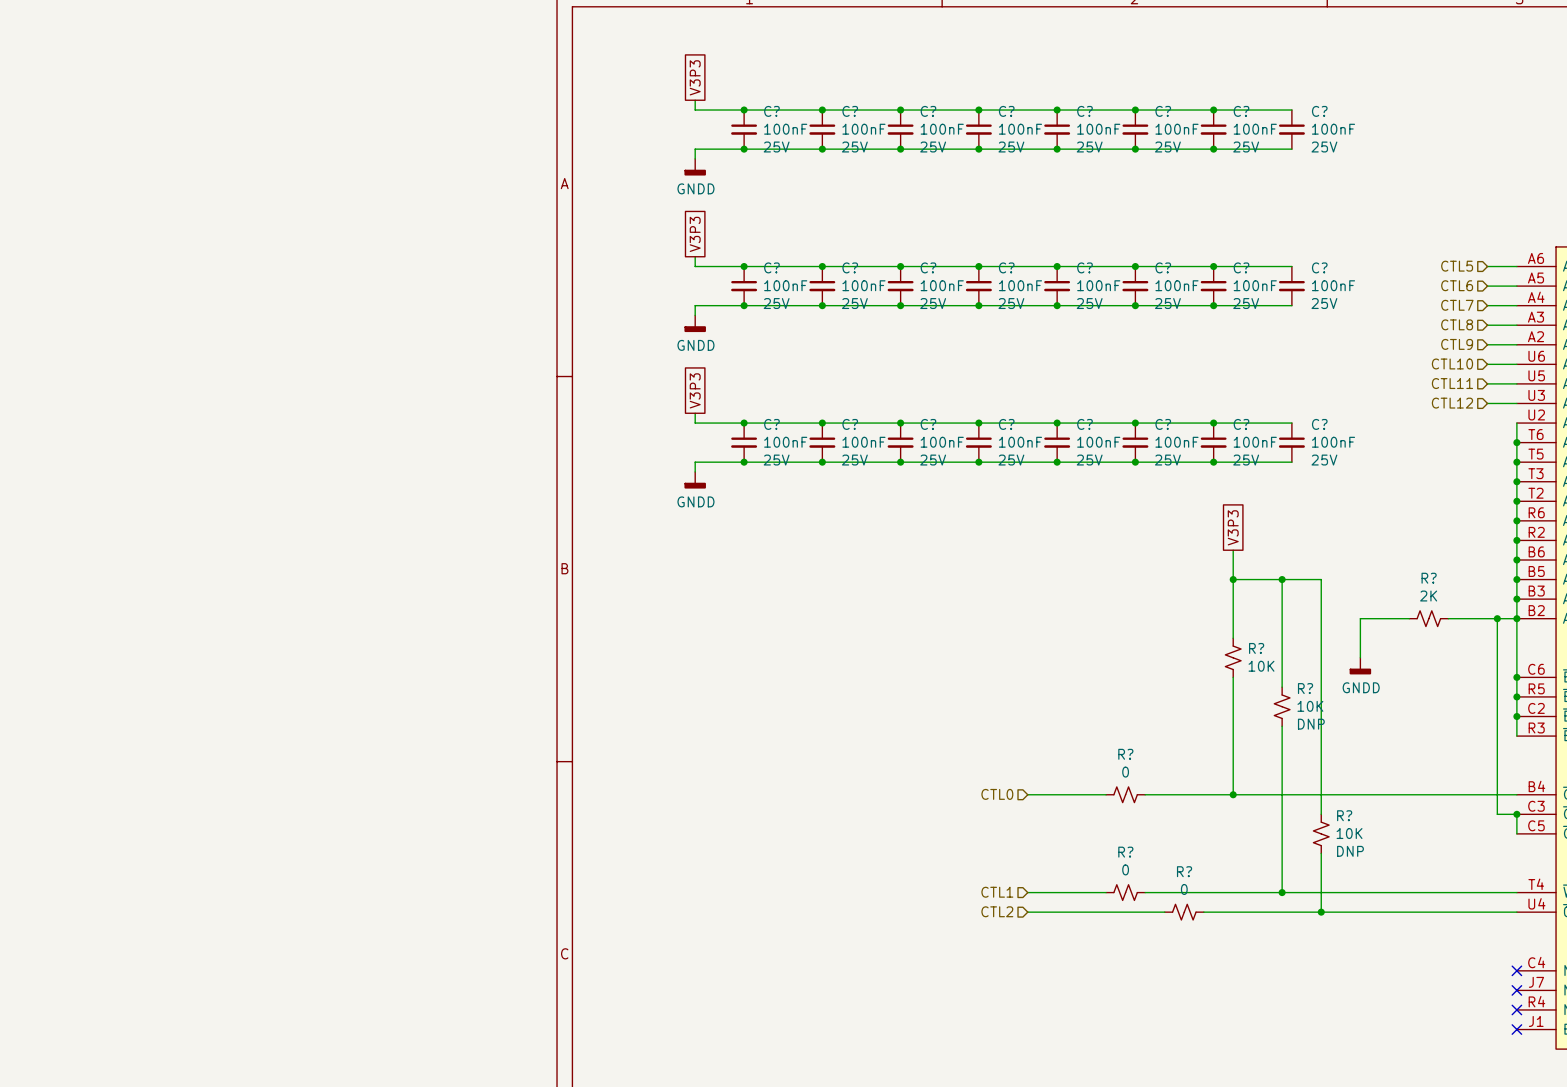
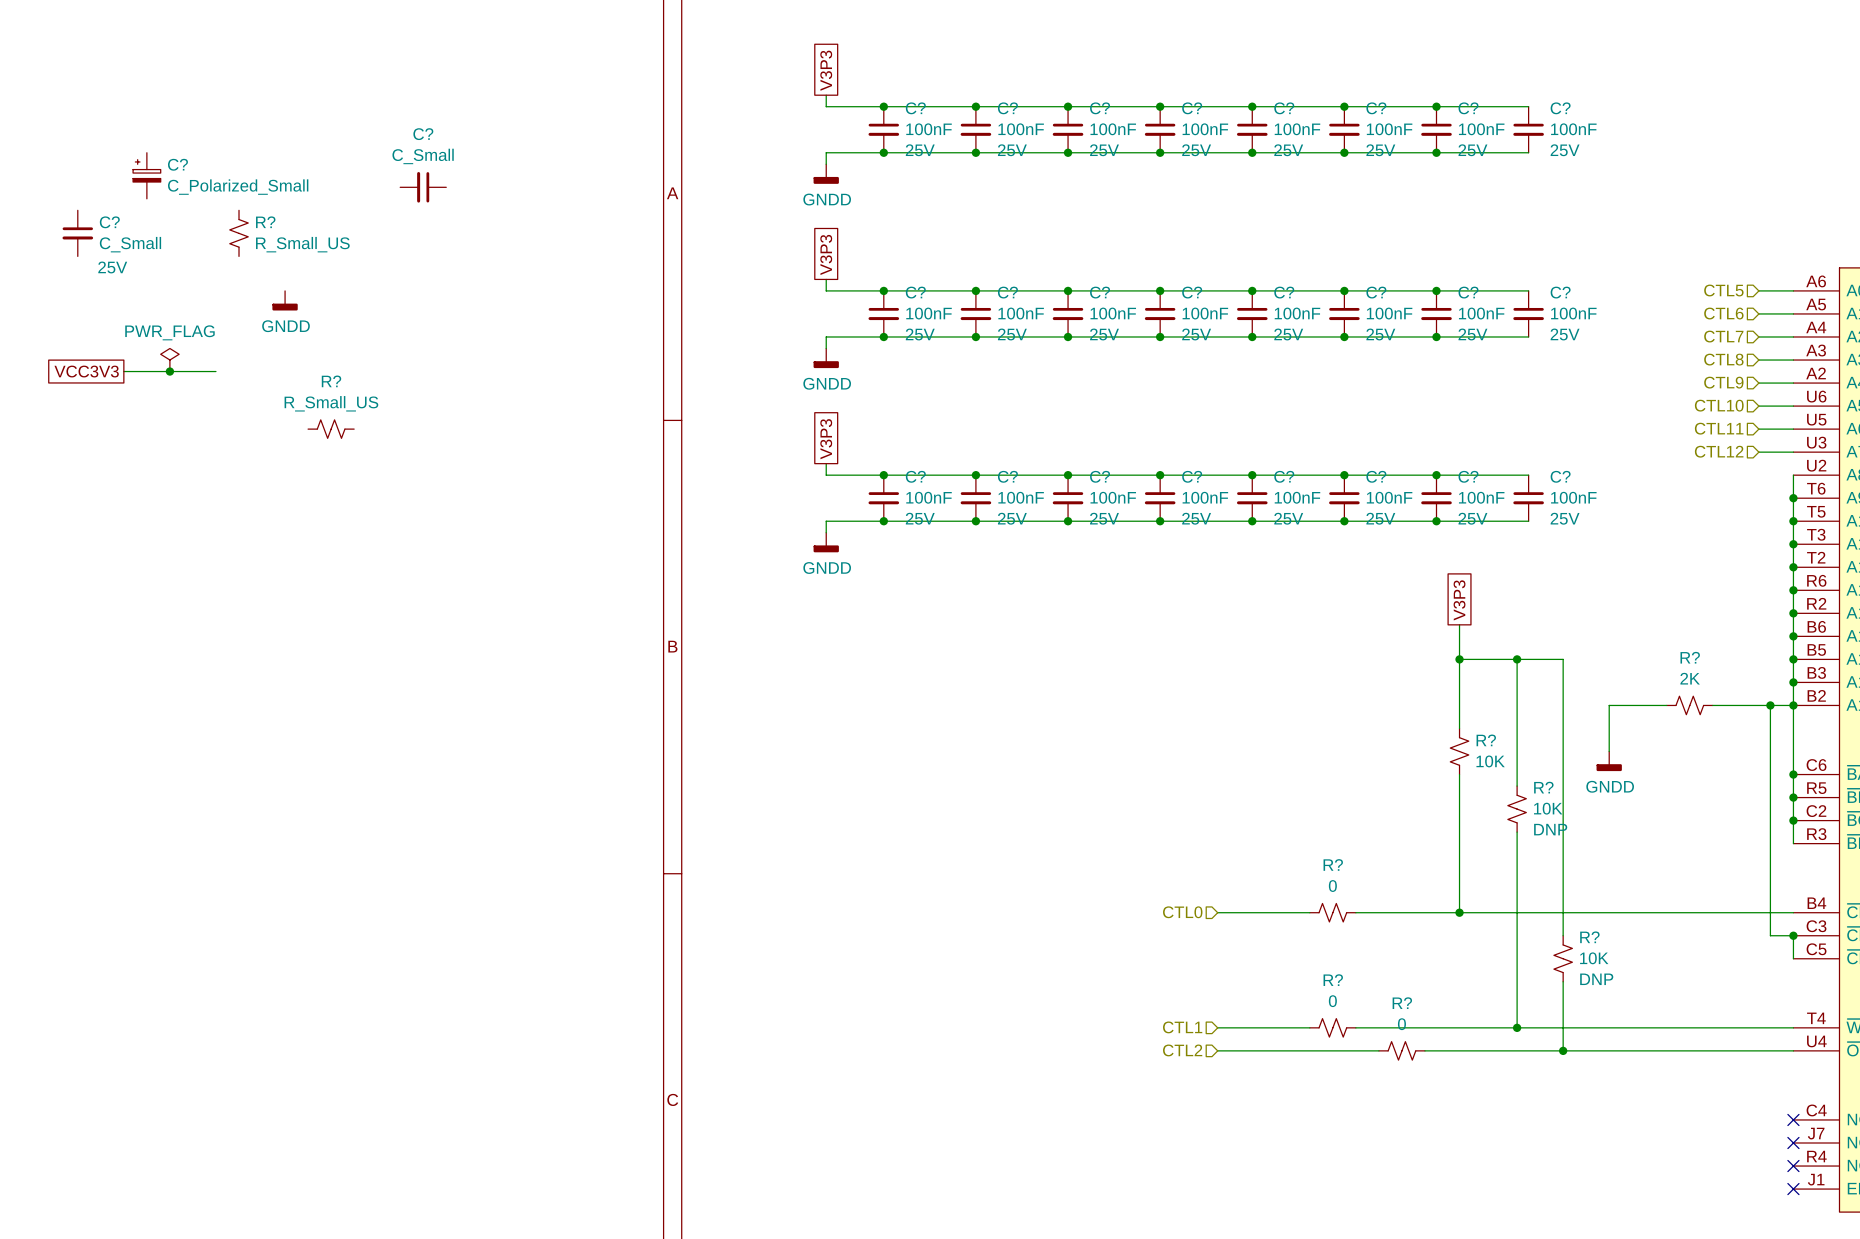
C?: none -> C_Polarized_Small (146, 175)
C?: none -> C_Small (423, 187)
C?: none -> C_Small (77, 233)
R?: none -> R_Small_US (239, 233)
power symbol: none -> GNDD (285, 300)
power symbol: none -> PWR_FLAG (169, 360)
global label: none -> VCC3V3 (86, 371)
wire: none -> (123, 371) (215, 371)
junction: none -> (169, 371)
R?: none -> R_Small_US (331, 429)

